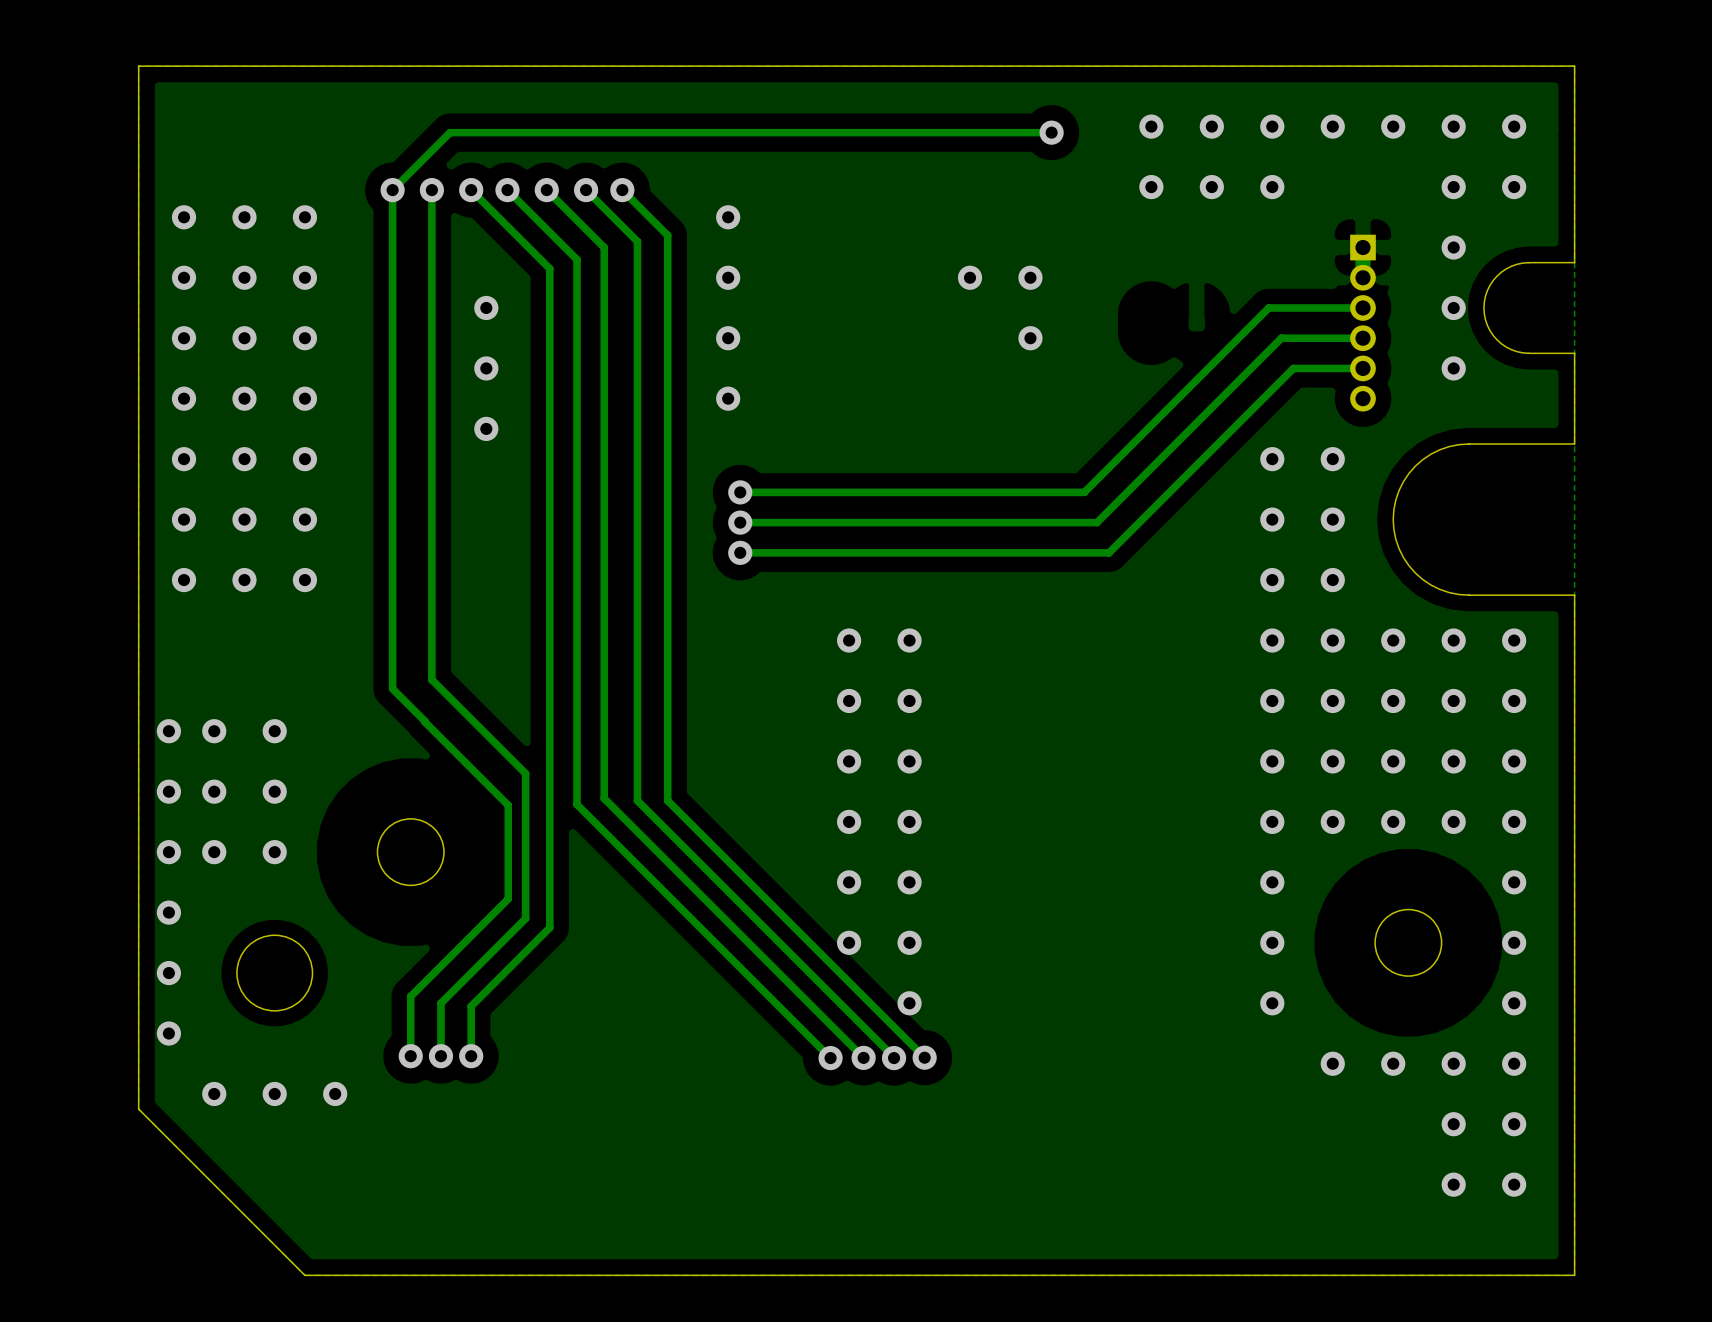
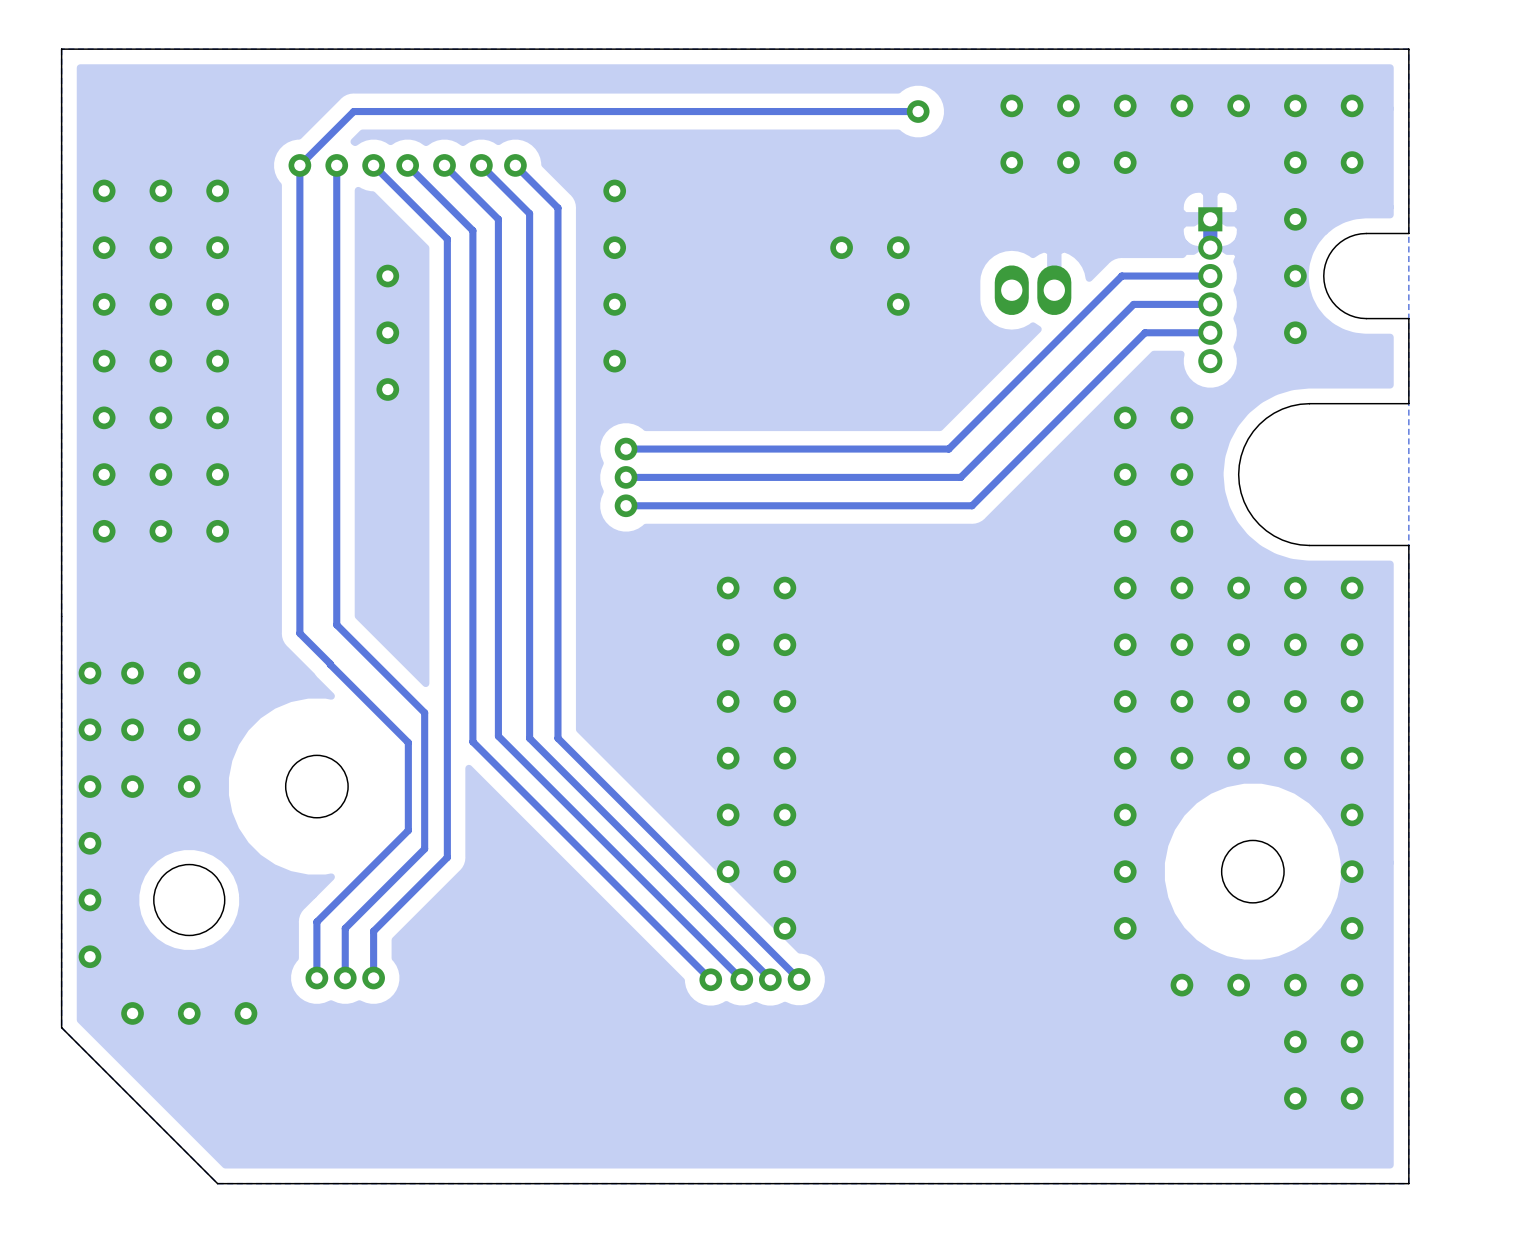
part: none -> (1033, 290)

